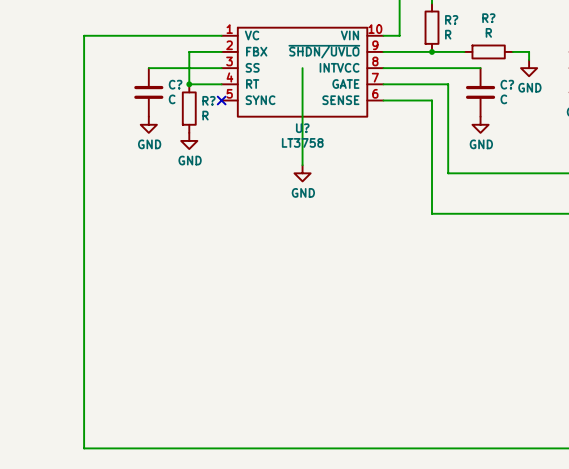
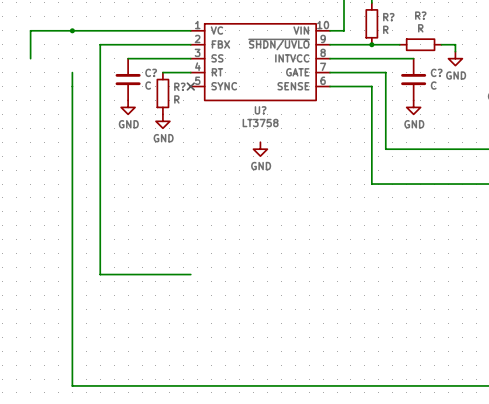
wire: (84, 35) (84, 84) -> (72, 30) (30, 30) (30, 58)
junction: none -> (72, 30)
wire: (189, 51) (189, 84) -> (162, 44) (100, 44) (100, 274) (190, 274)
wire: (302, 68) (302, 165) -> none
junction: (189, 84) -> none

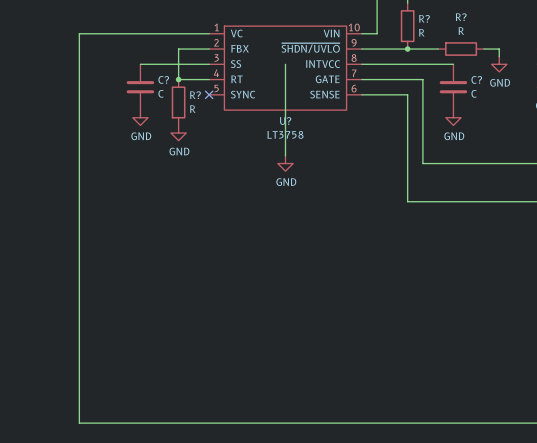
wire: (72, 30) (30, 30) (30, 58) -> (79, 33) (79, 79)
junction: (72, 30) -> none
wire: (162, 44) (100, 44) (100, 274) (190, 274) -> (178, 49) (178, 79)
wire: none -> (285, 64) (285, 155)
junction: none -> (178, 79)

